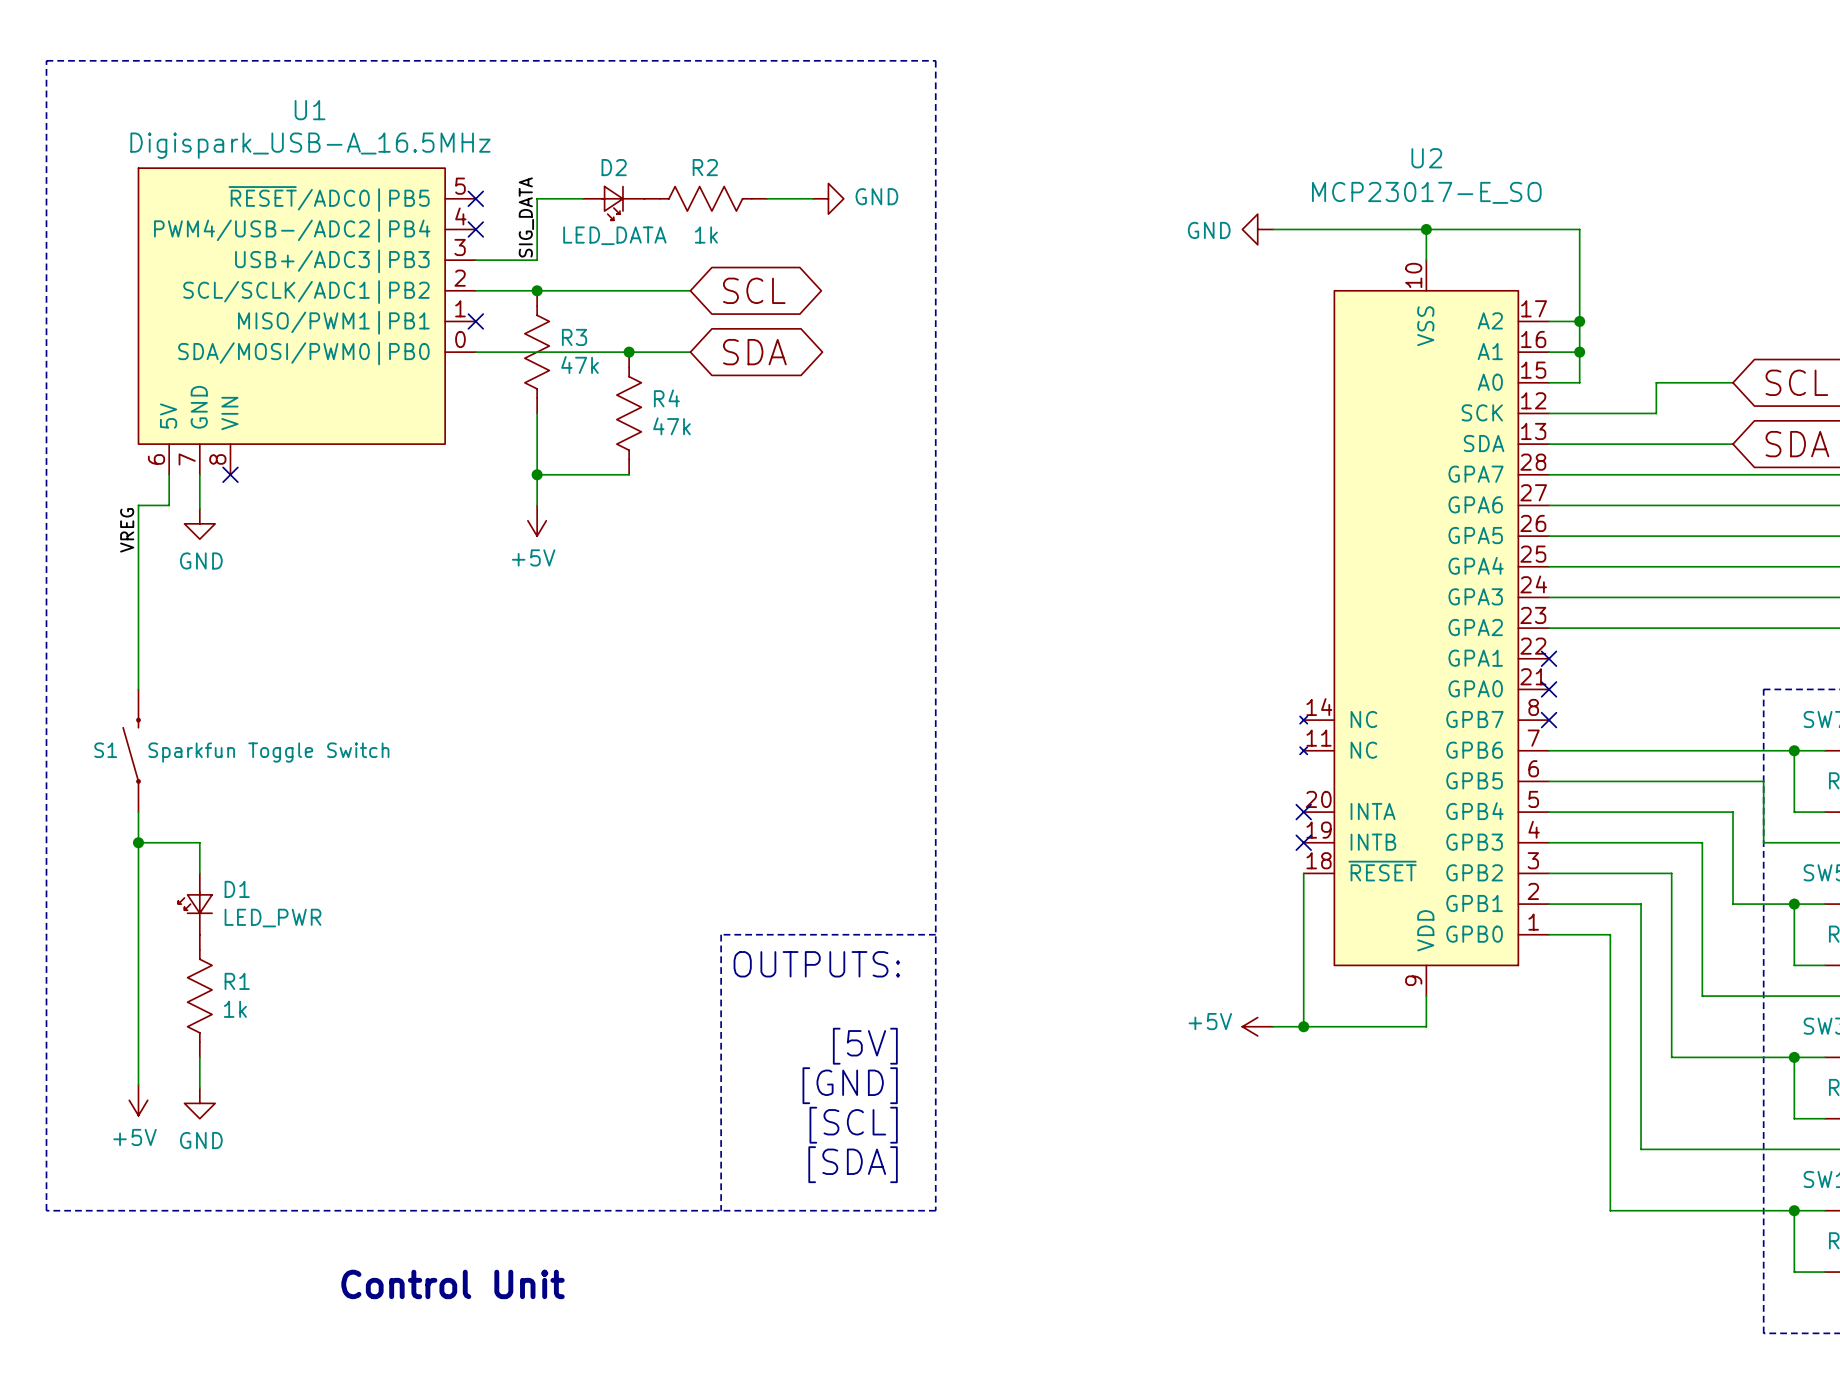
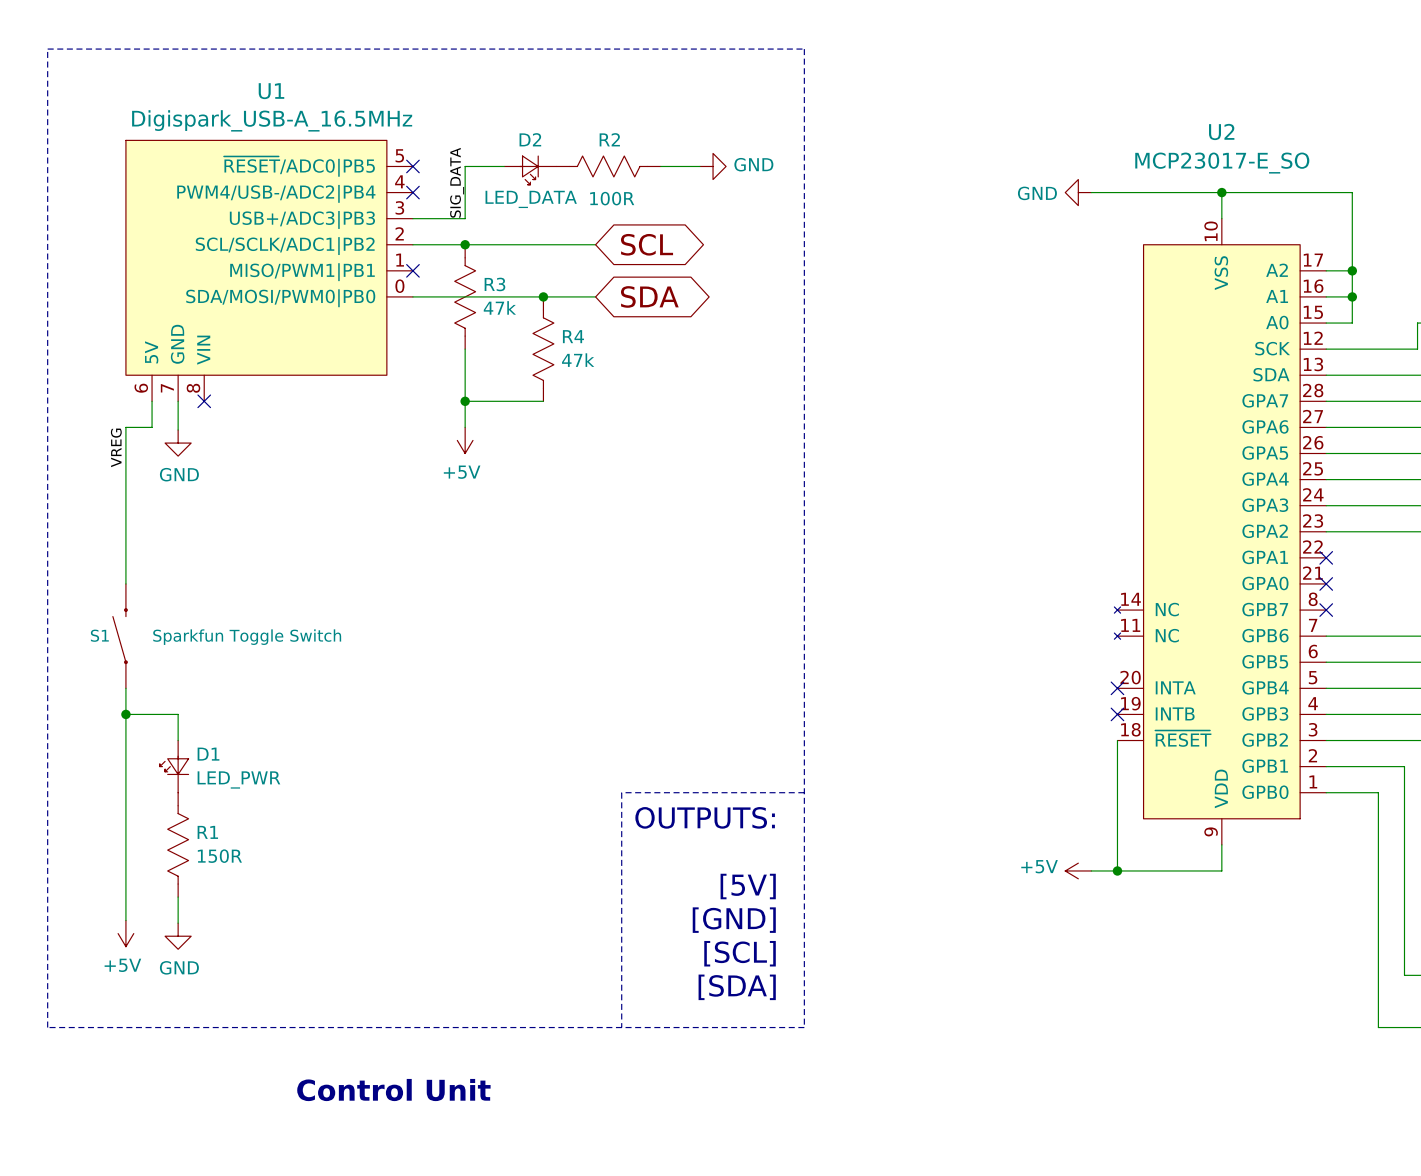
R2 value: 1k (706, 235) -> 100R (612, 198)
R1 value: 1k (235, 1009) -> 150R (219, 856)

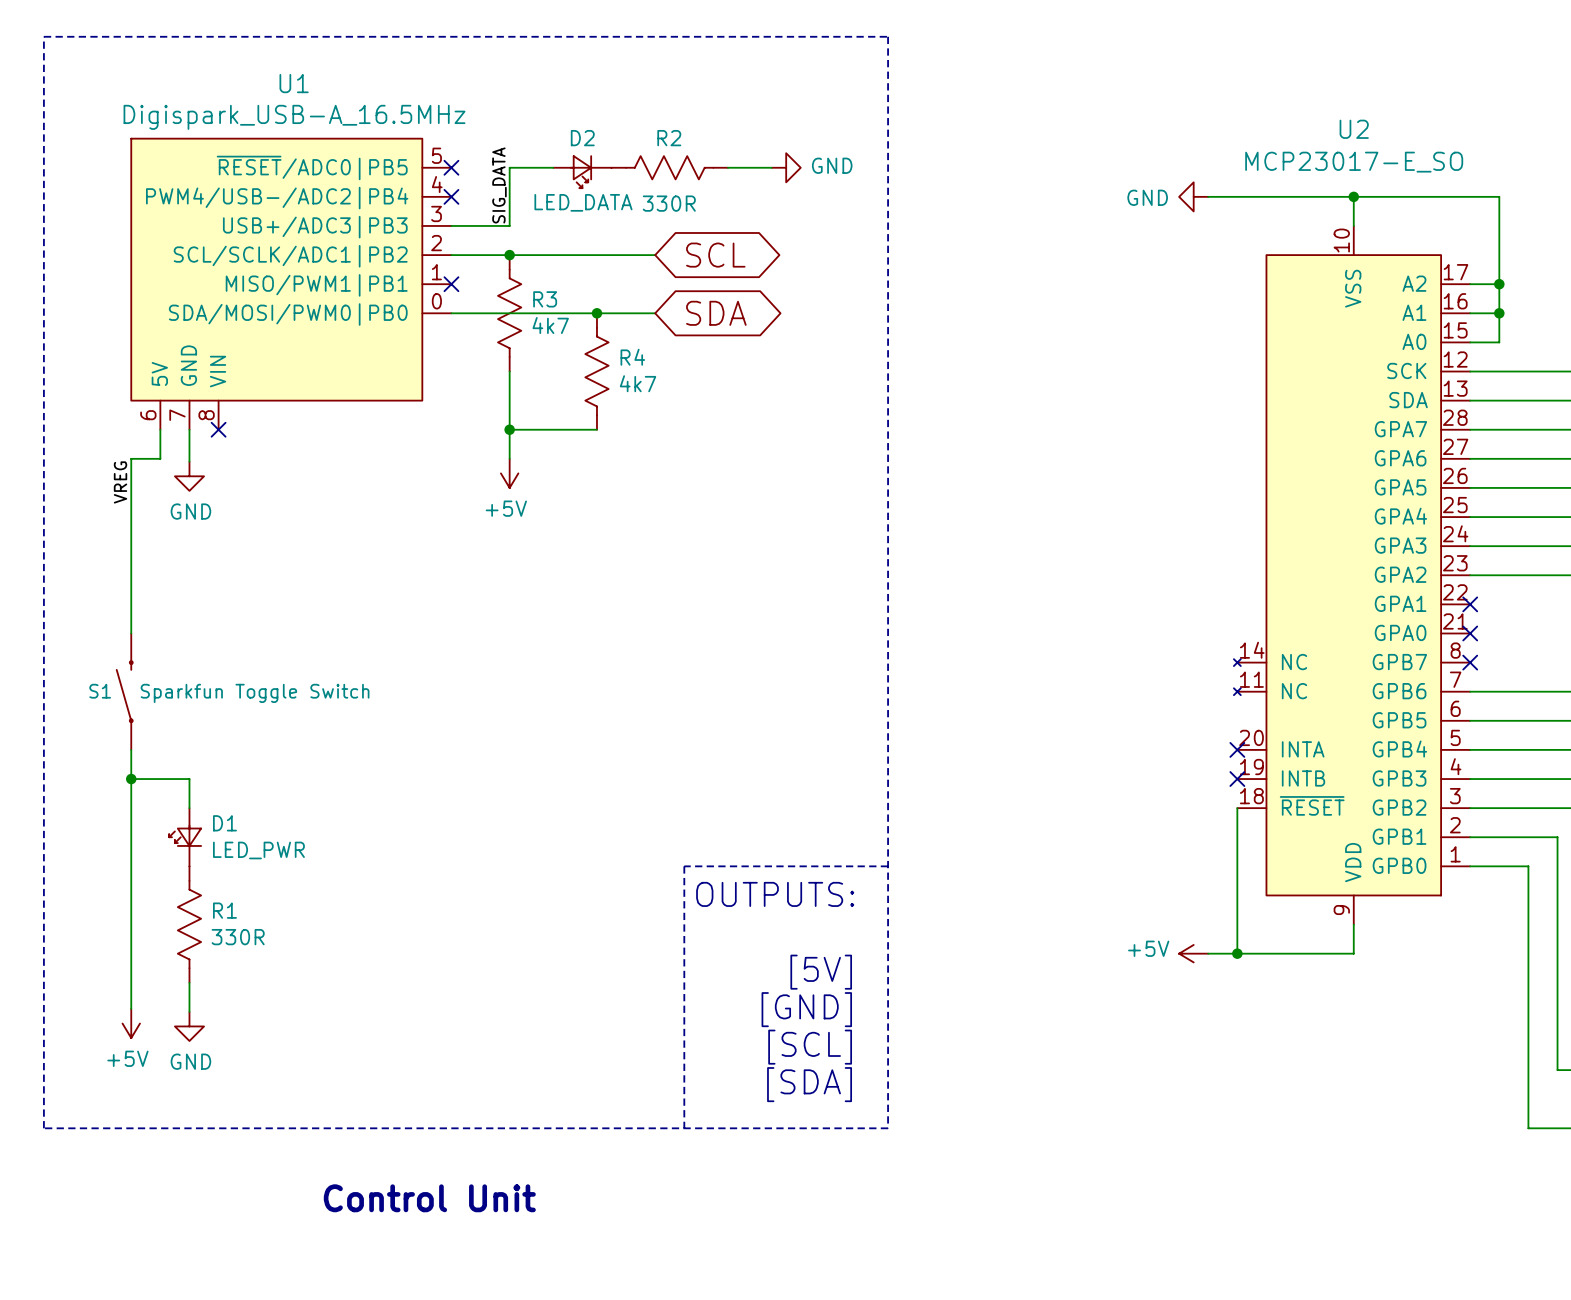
R2 value: 100R (612, 198) -> 330R (669, 203)
R3 value: 47k (499, 307) -> 4k7 (550, 325)
R4 value: 47k (578, 360) -> 4k7 (638, 383)
R1 value: 150R (219, 856) -> 330R (238, 937)

